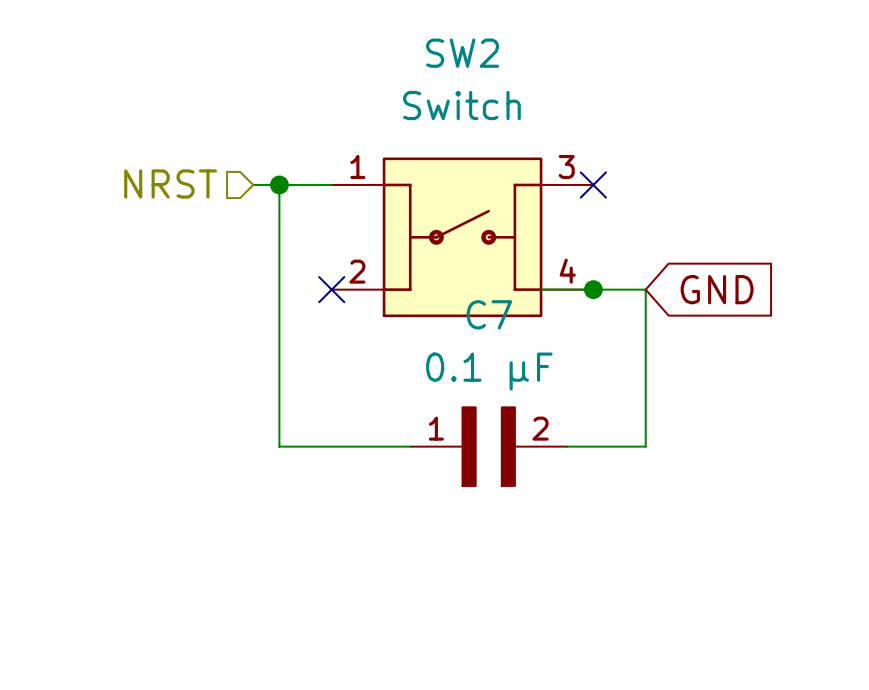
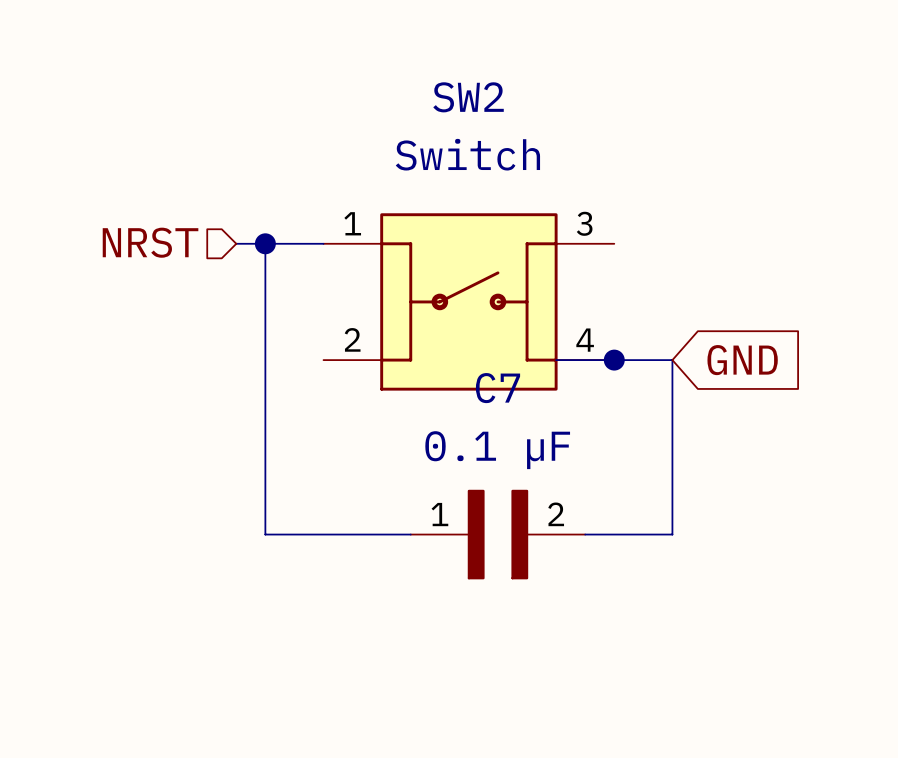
no-connect mark: (593, 184) -> none
no-connect mark: (331, 289) -> none

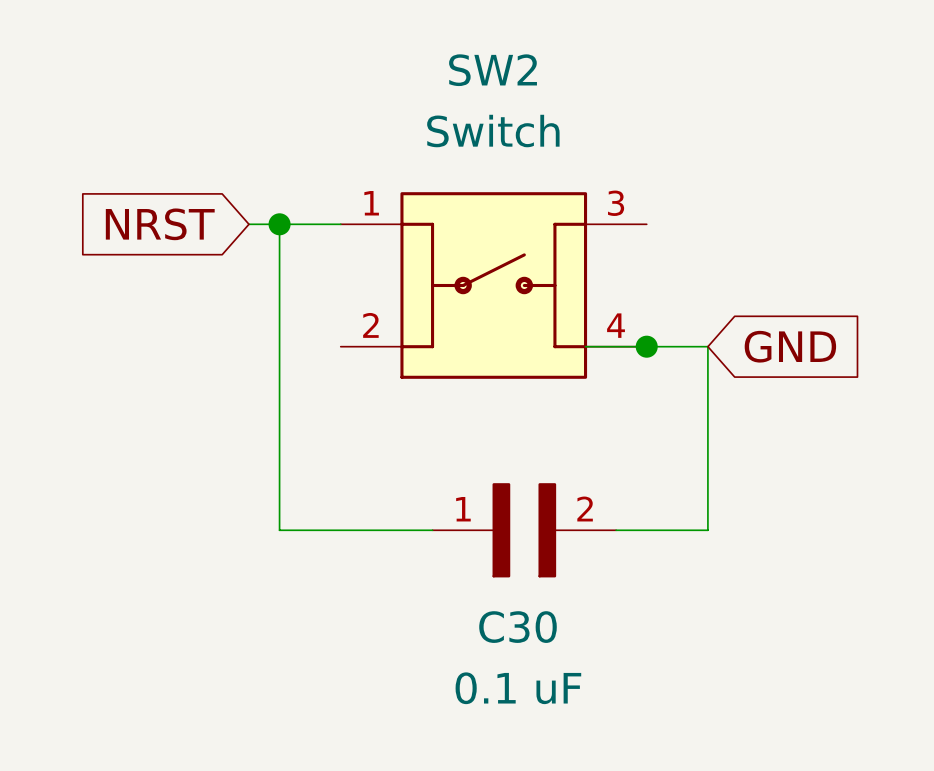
hierarchical label: NRST (150, 242) -> none
global label: none -> NRST (160, 224)
C7 name: C7 (498, 388) -> C30 (518, 627)
C7 value: 0.1 µF (497, 450) -> 0.1 uF (518, 688)

